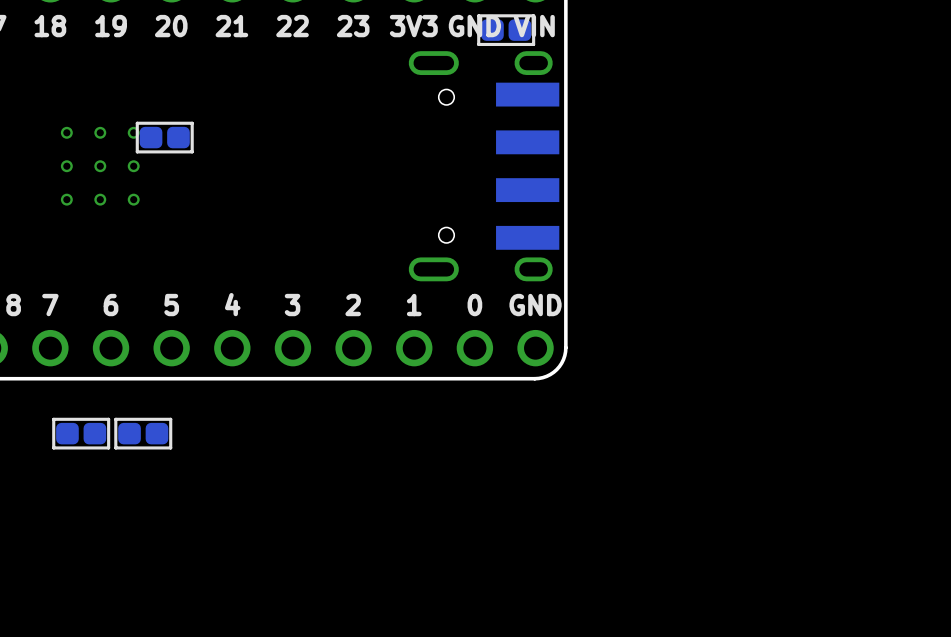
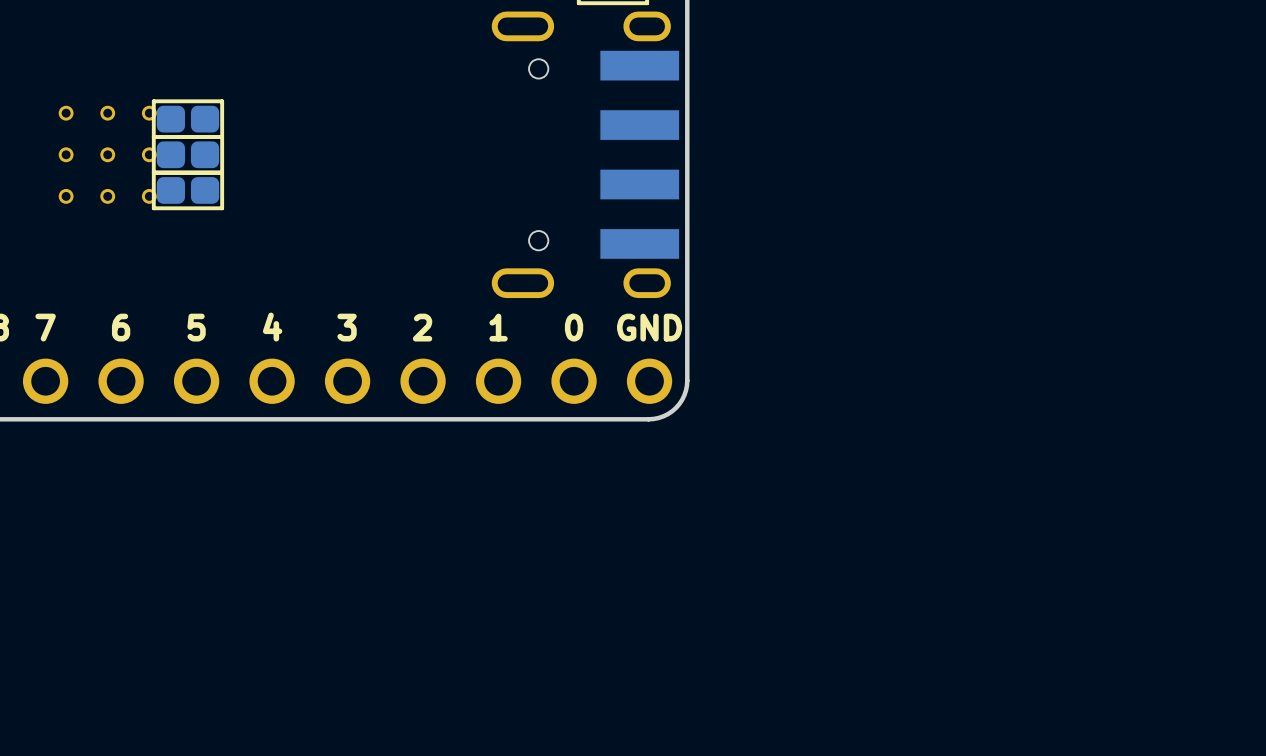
part: none -> (187, 154)
part: none -> (187, 190)
part: (81, 433) -> none
part: (143, 433) -> none

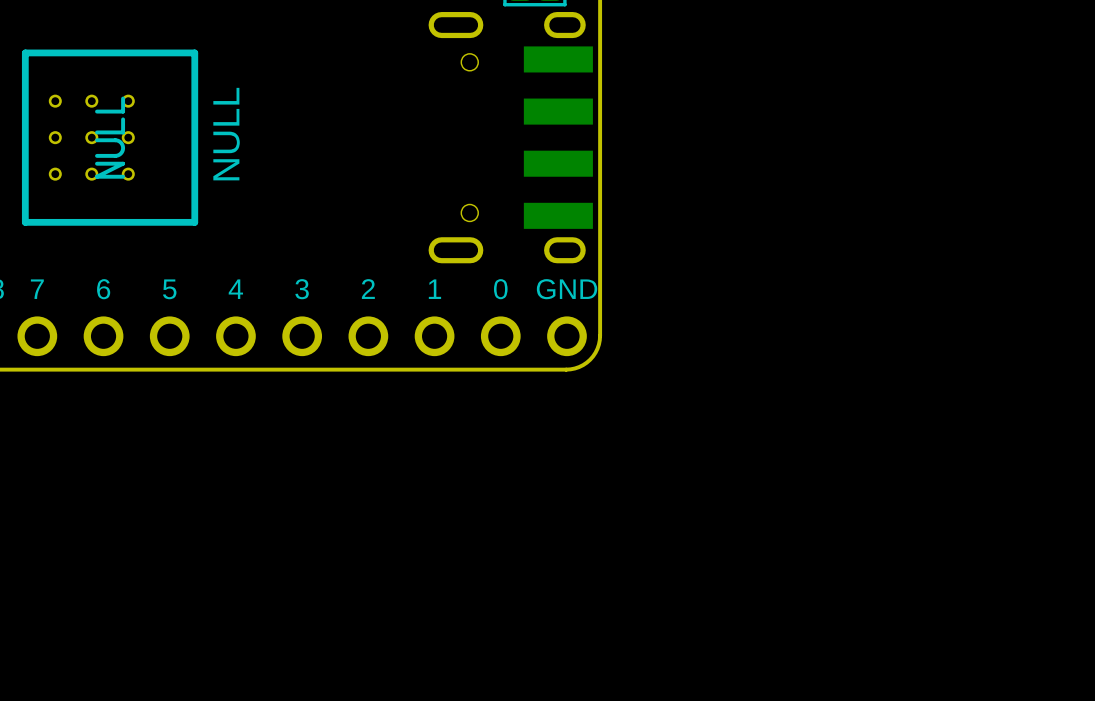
drawing: none -> [21, 49, 199, 226]
part: (187, 119) -> none
text: none -> NULL (226, 134)
part: (187, 154) -> none
part: (187, 190) -> none

